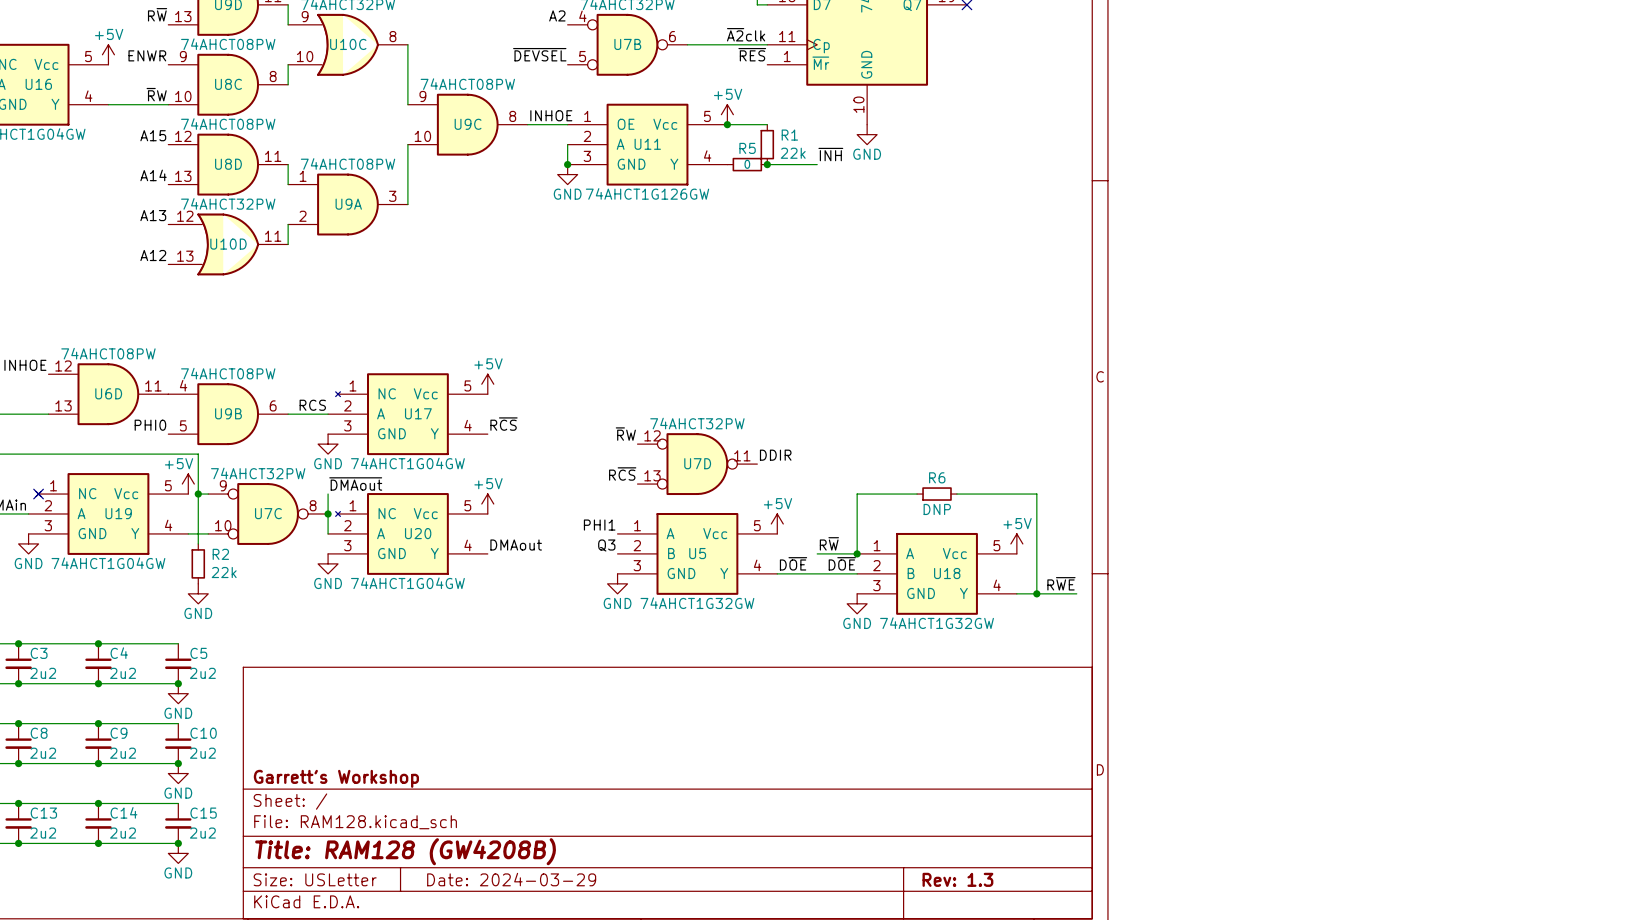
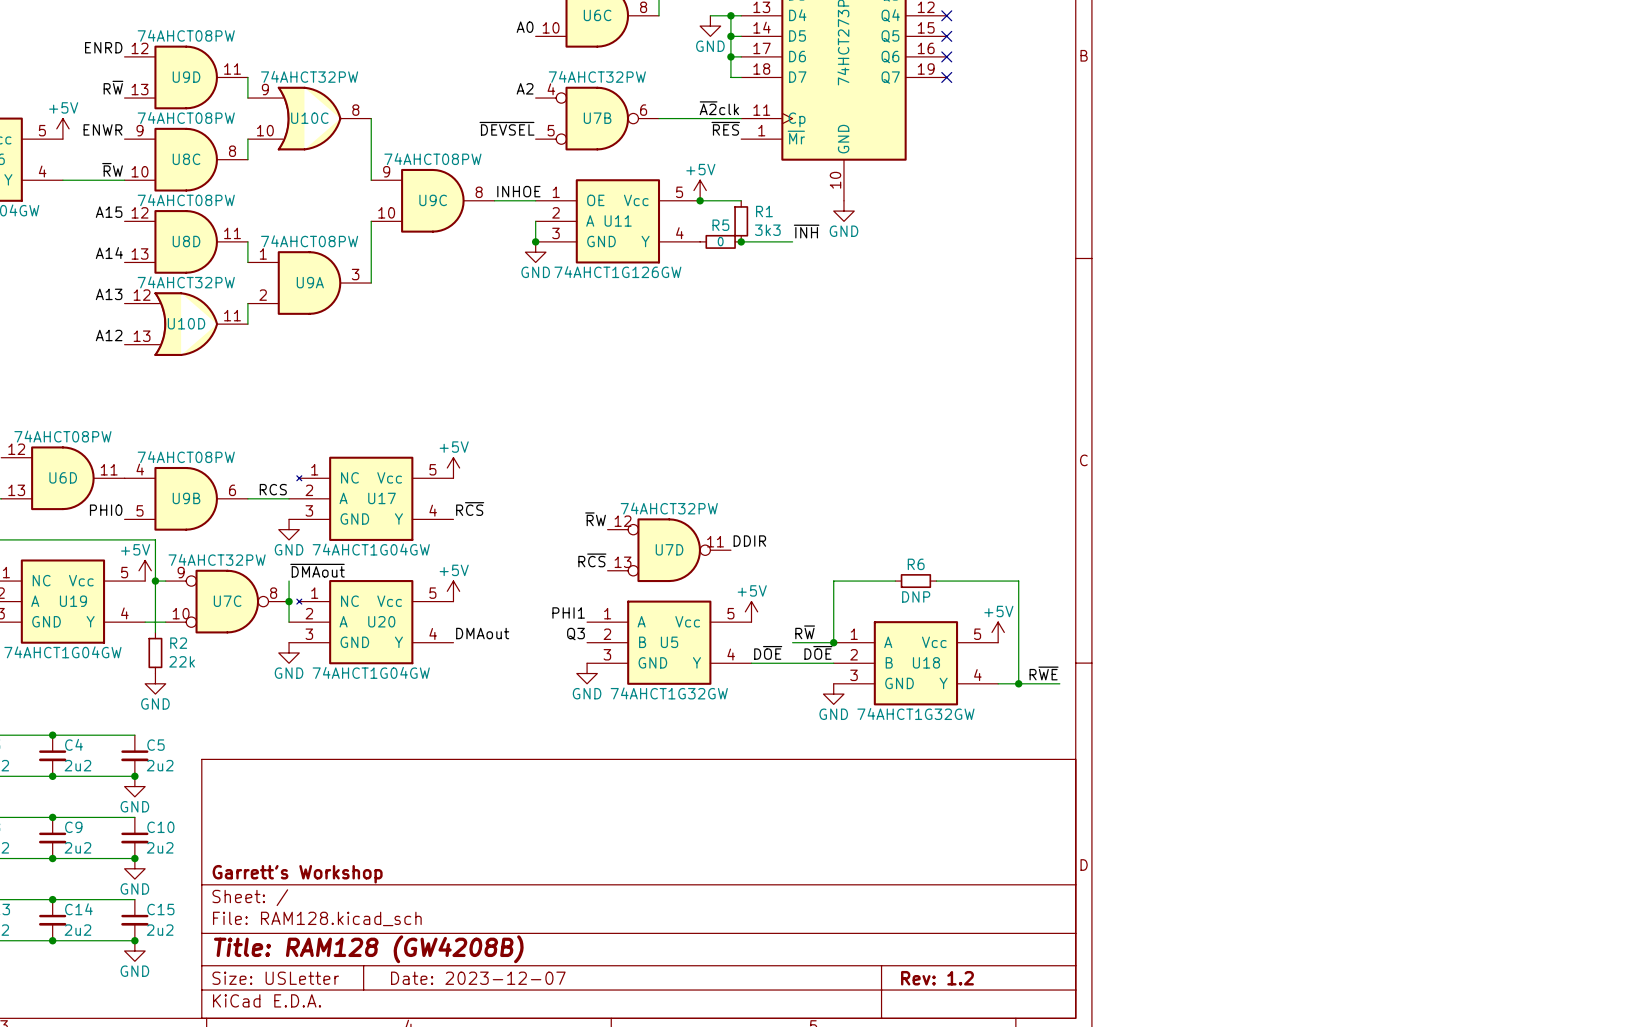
R1 value: 22k (793, 153) -> 3k3 (767, 230)
title block: Date: 2024-03-29 (511, 879) -> Date: 2023-12-07 (478, 978)
title block: Rev: 1.3 (957, 879) -> Rev: 1.2 (937, 978)

